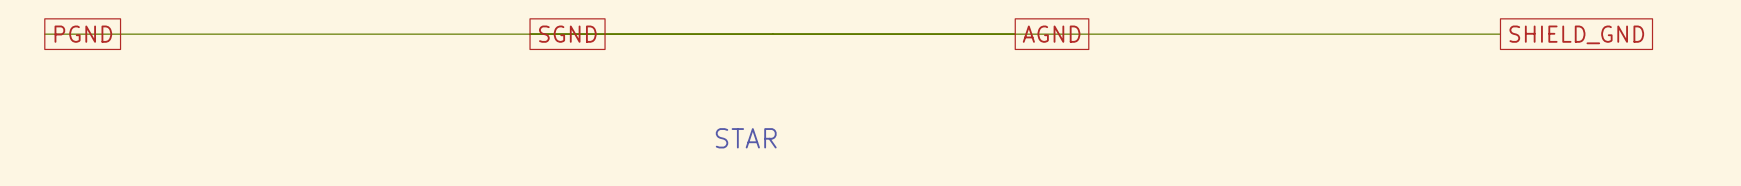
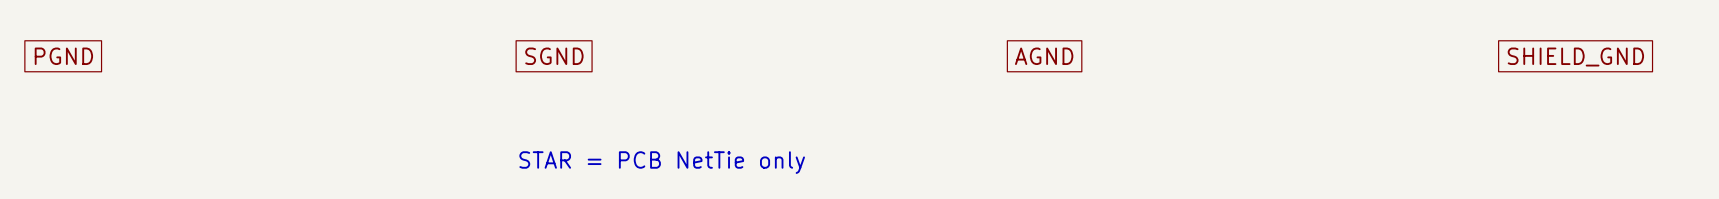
wire: (44, 34) (1500, 34) -> none
text: STAR (746, 138) -> none
text: none -> STAR = PCB NetTie only (662, 162)

